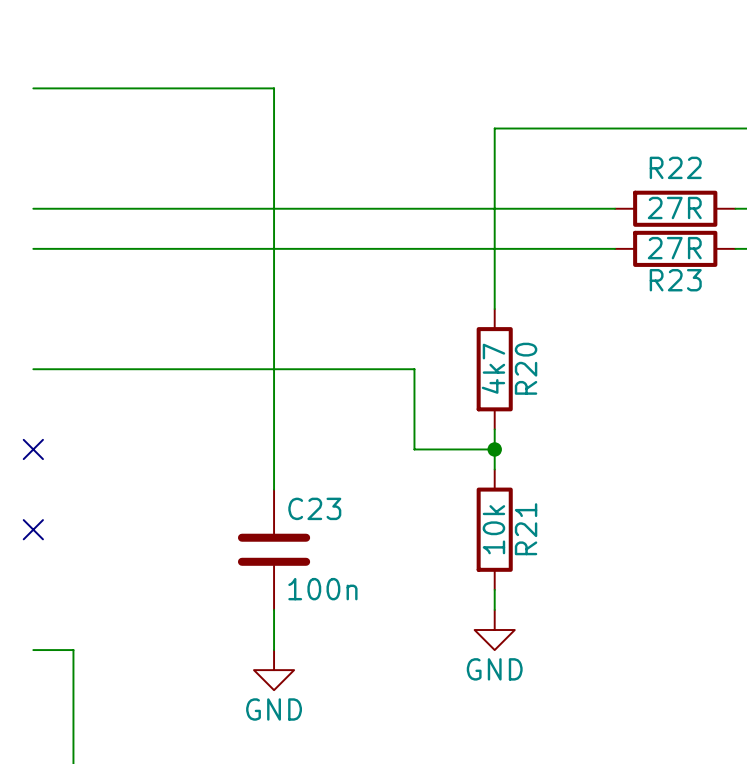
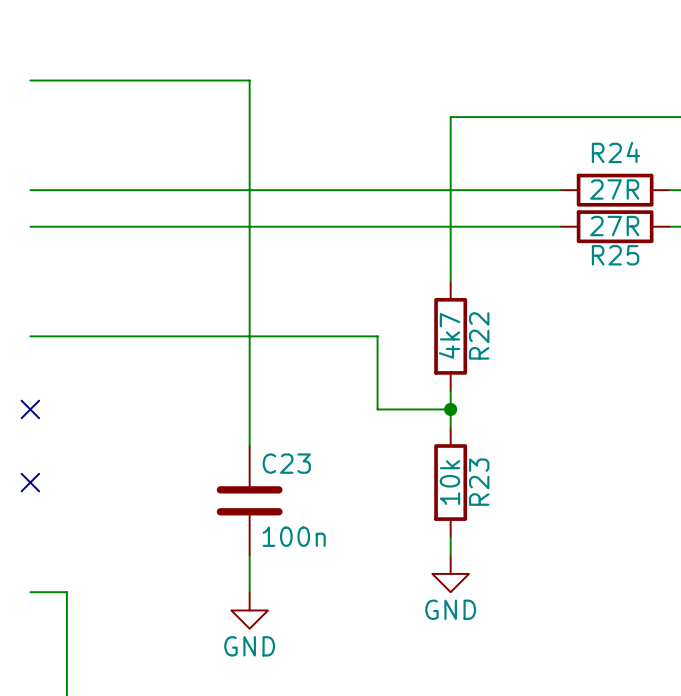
R22 name: R22 (675, 167) -> R24 (616, 152)
R23 name: R23 (675, 280) -> R25 (615, 255)
R20 name: R20 (526, 368) -> R22 (479, 335)
R21 name: R21 (526, 529) -> R23 (479, 482)

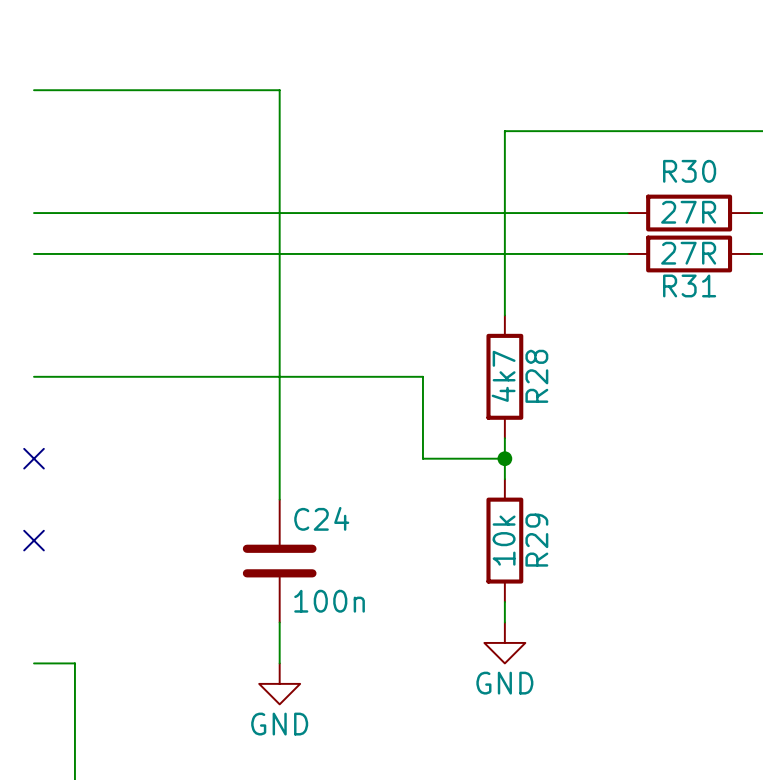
R24 name: R24 (616, 152) -> R30 (689, 171)
R25 name: R25 (615, 255) -> R31 (689, 285)
R22 name: R22 (479, 335) -> R28 (536, 376)
C23 name: C23 (286, 463) -> C24 (321, 518)
R23 name: R23 (479, 482) -> R29 (536, 540)

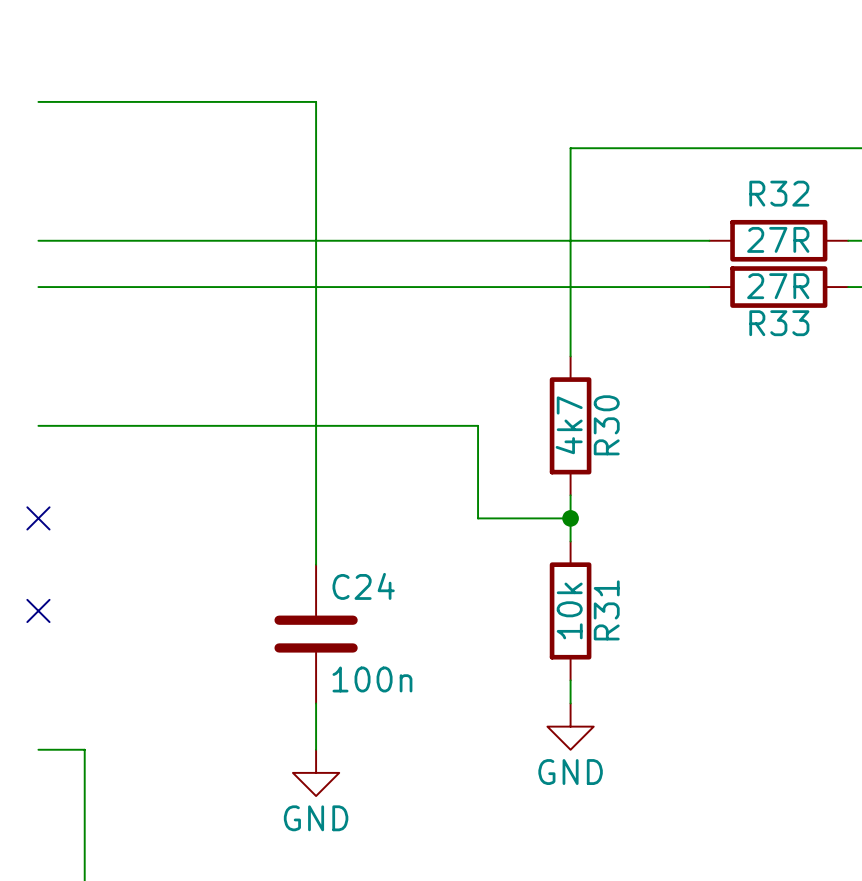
R30 name: R30 (689, 171) -> R32 (779, 193)
R31 name: R31 (689, 285) -> R33 (779, 323)
R28 name: R28 (536, 376) -> R30 (606, 425)
R29 name: R29 (536, 540) -> R31 (606, 610)

